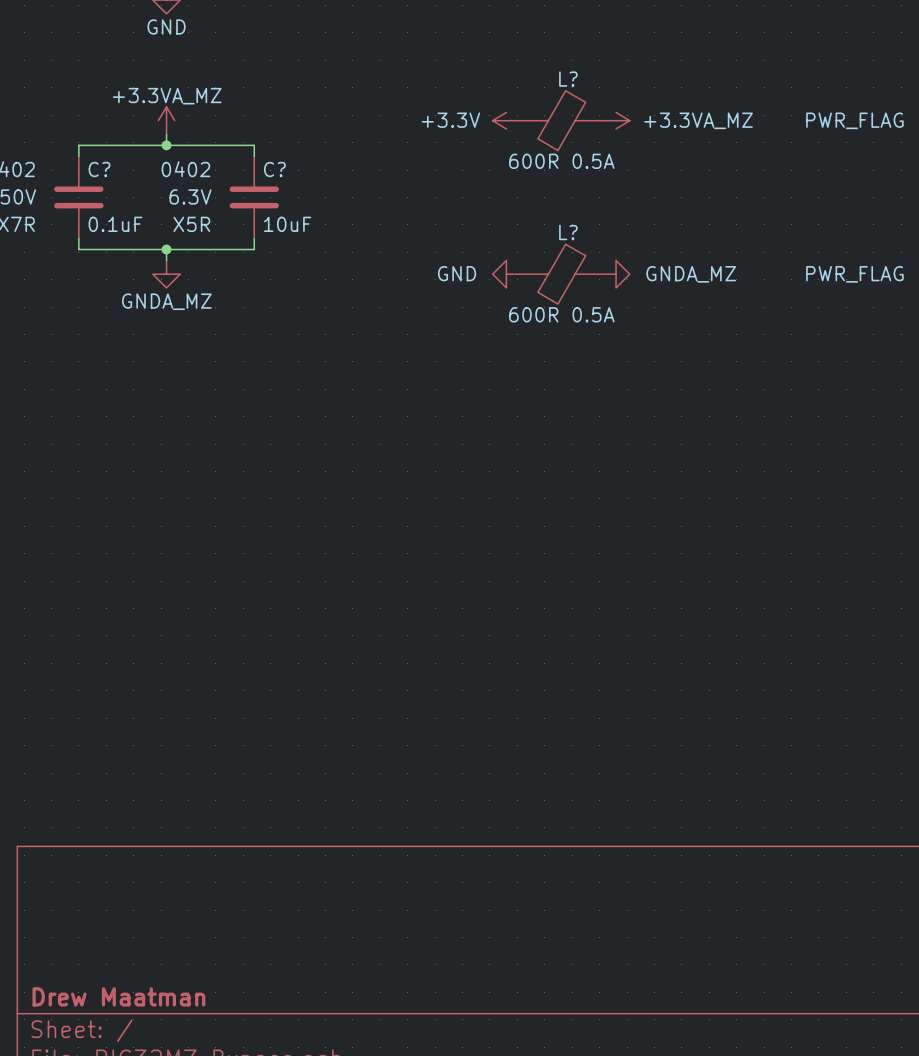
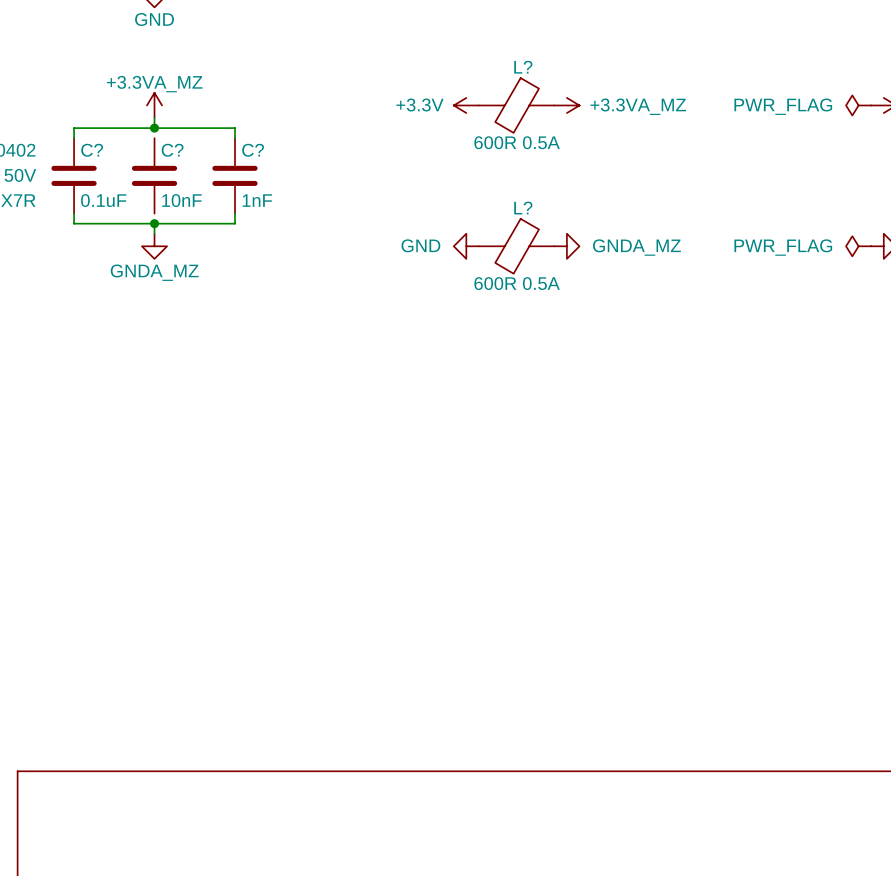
C? text: 0402 (185, 169) -> none
C? text: 6.3V (190, 196) -> none
C?: none -> 10nF (154, 175)
C? text: X5R (191, 224) -> none
C? value: 10uF (287, 224) -> 1nF (257, 200)

